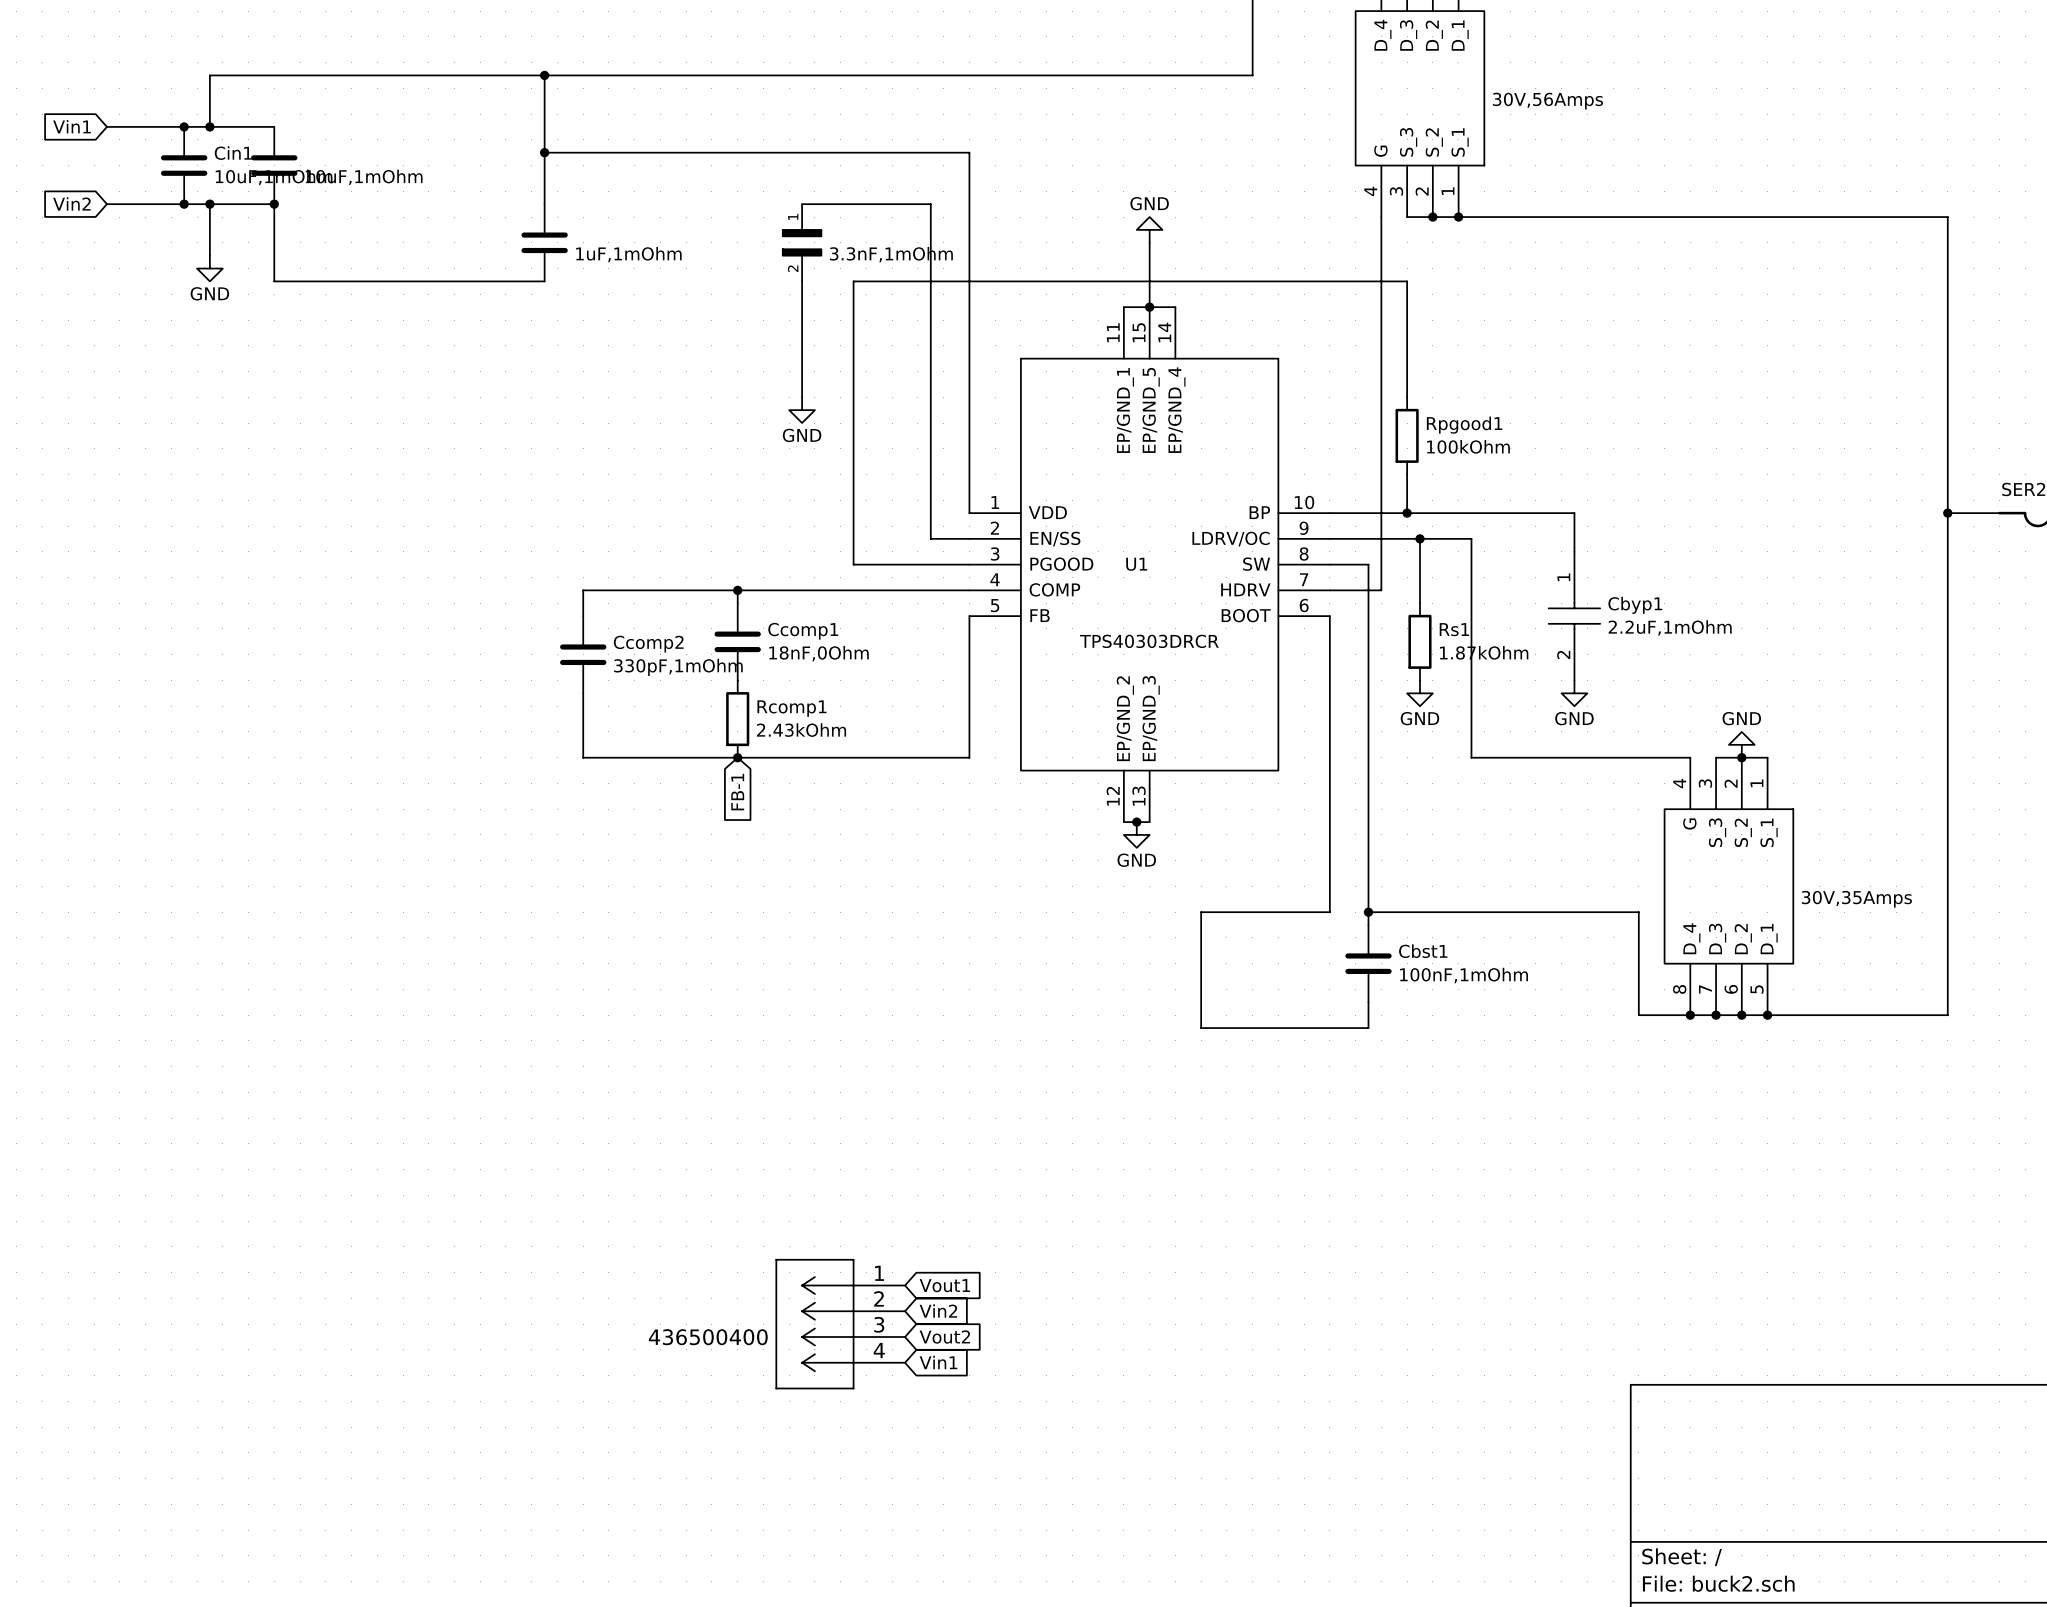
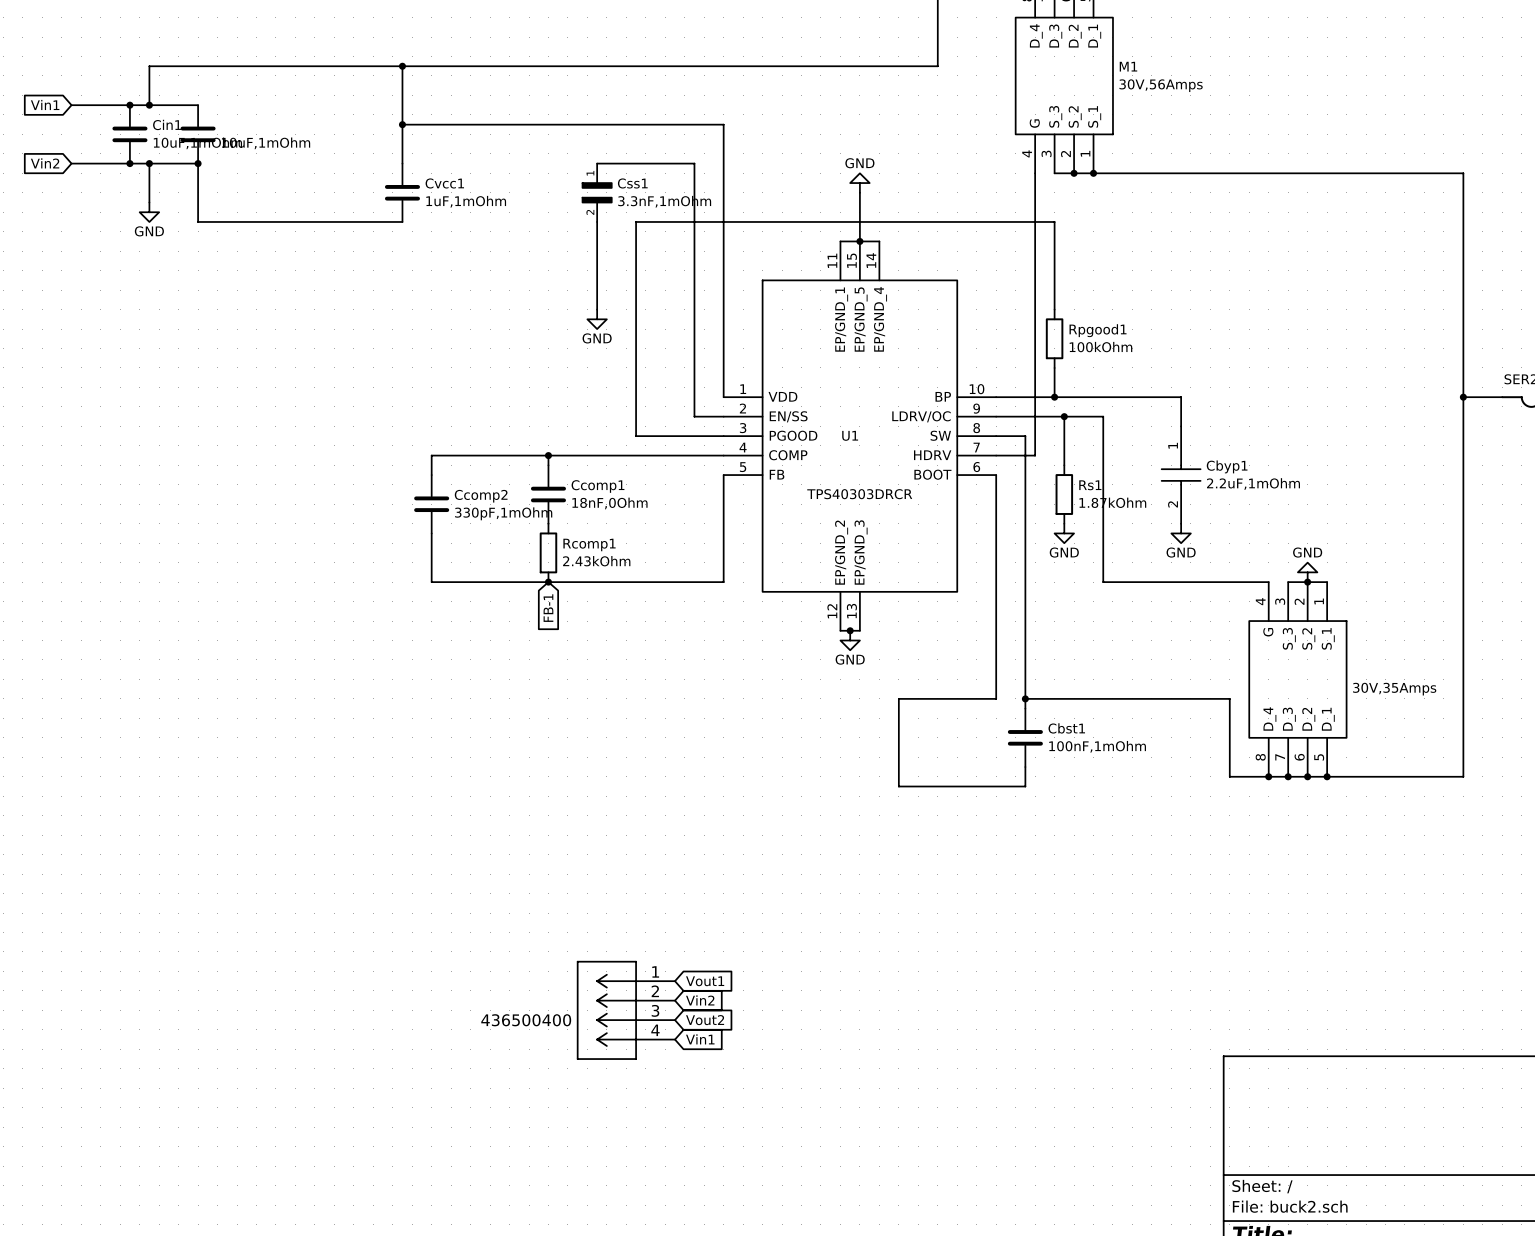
M1 name: none -> M1 (1128, 66)
Cvcc1 name: none -> Cvcc1 (444, 183)
Css1 name: none -> Css1 (632, 183)

